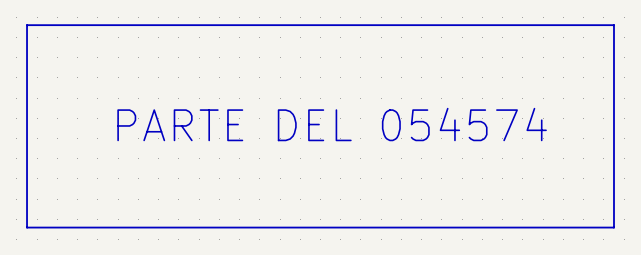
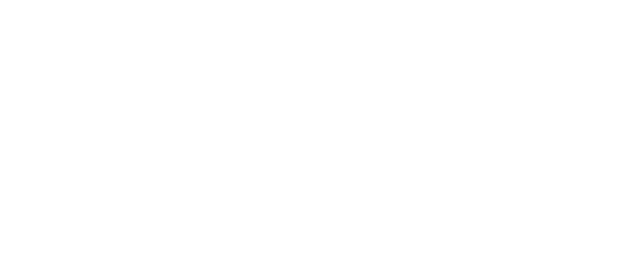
line: (27, 25) (613, 25) (613, 227) (27, 227) (27, 25) -> none
text: PARTE DEL 054574 (332, 124) -> none

